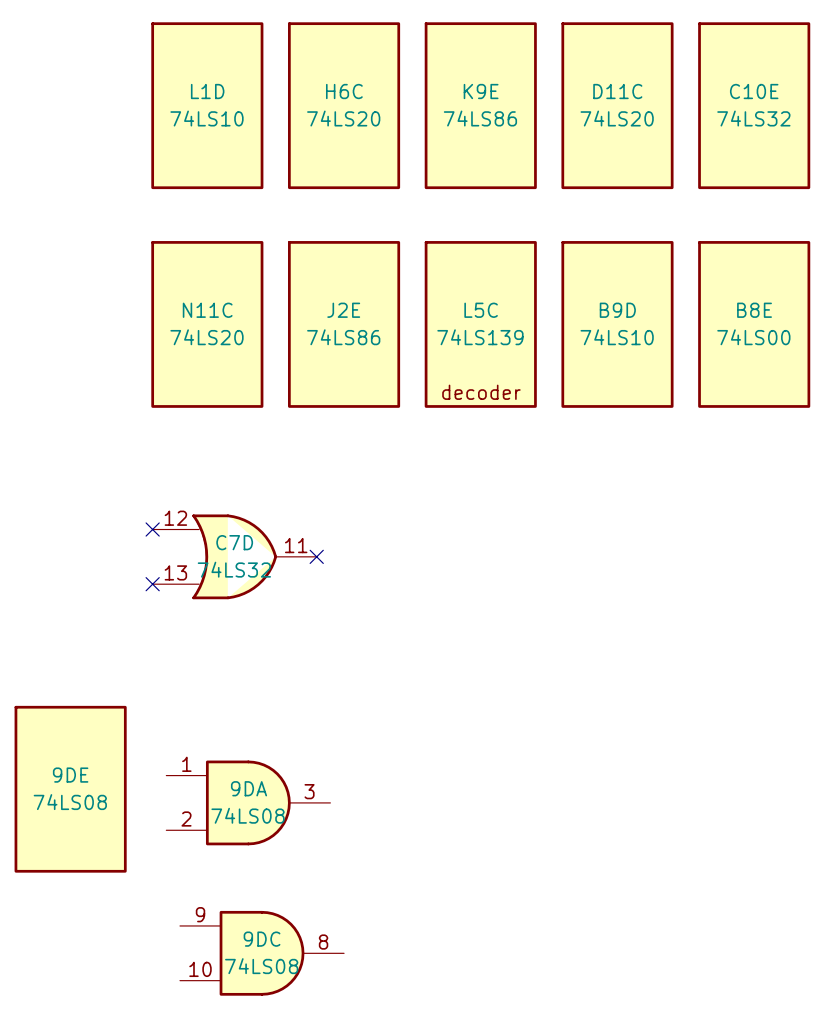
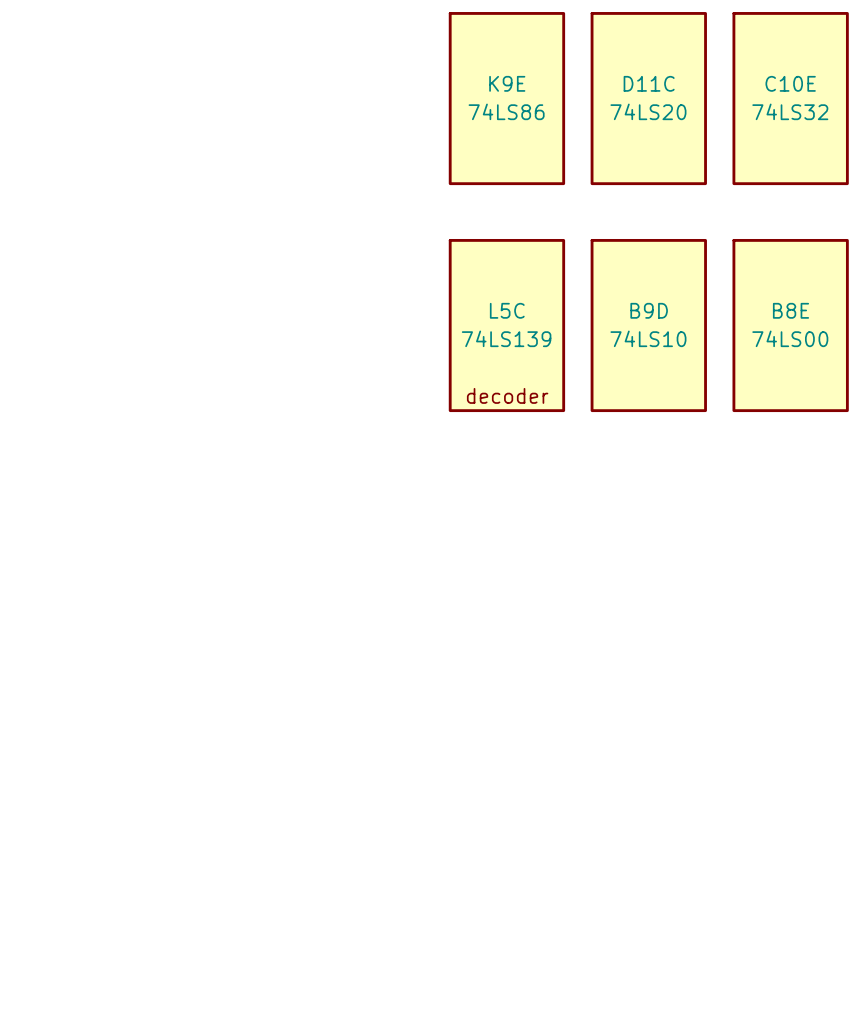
L1D: 74LS10 (207, 105) -> none
H6C: 74LS20 (344, 105) -> none
N11C: 74LS20 (207, 324) -> none
J2E: 74LS86 (344, 324) -> none
no-connect mark: (152, 529) -> none
C7D: 74LS32 (234, 556) -> none
no-connect mark: (316, 556) -> none
no-connect mark: (152, 584) -> none
9DE: 74LS08 (70, 789) -> none
9DA: 74LS08 (248, 802) -> none
9DC: 74LS08 (262, 953) -> none

